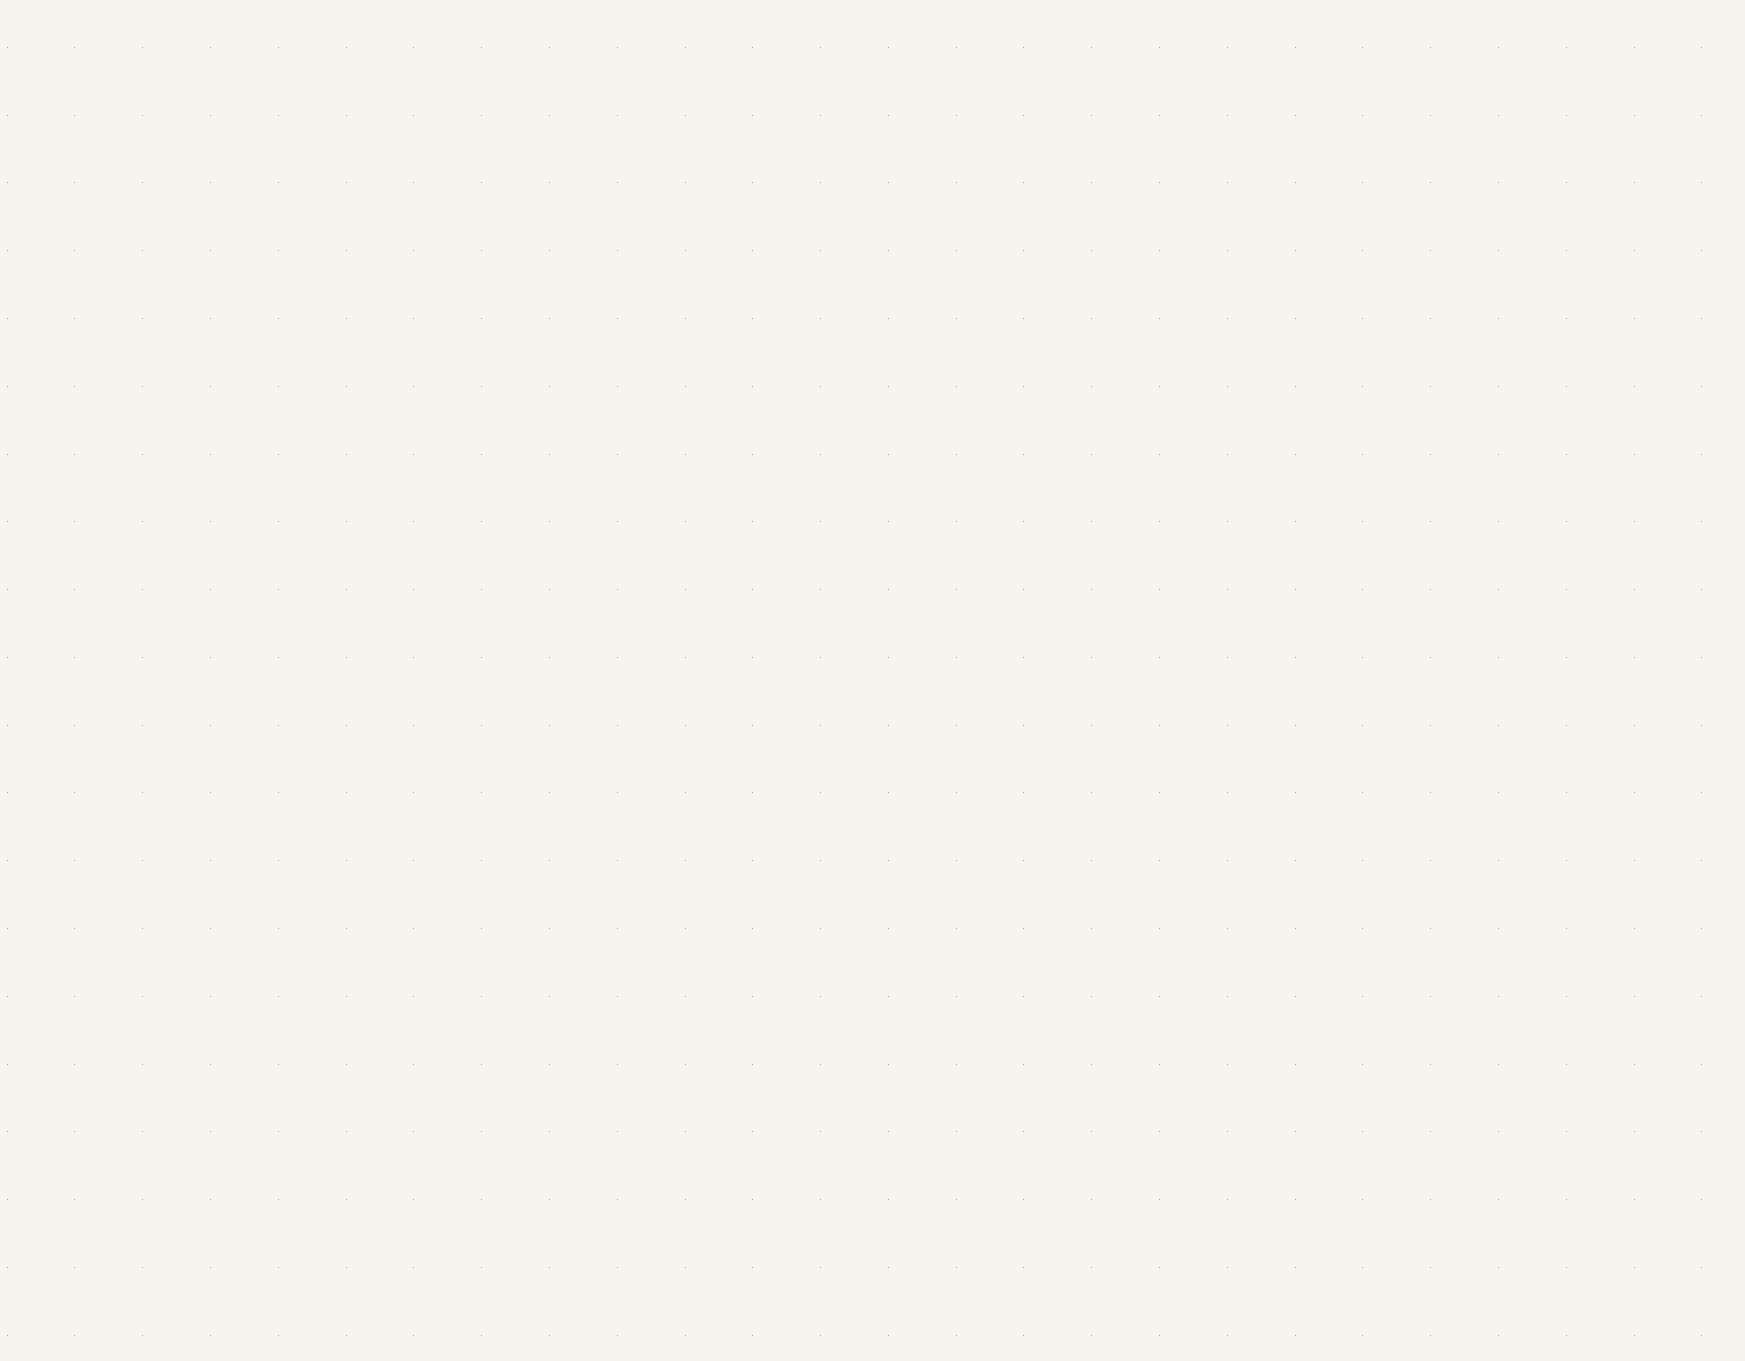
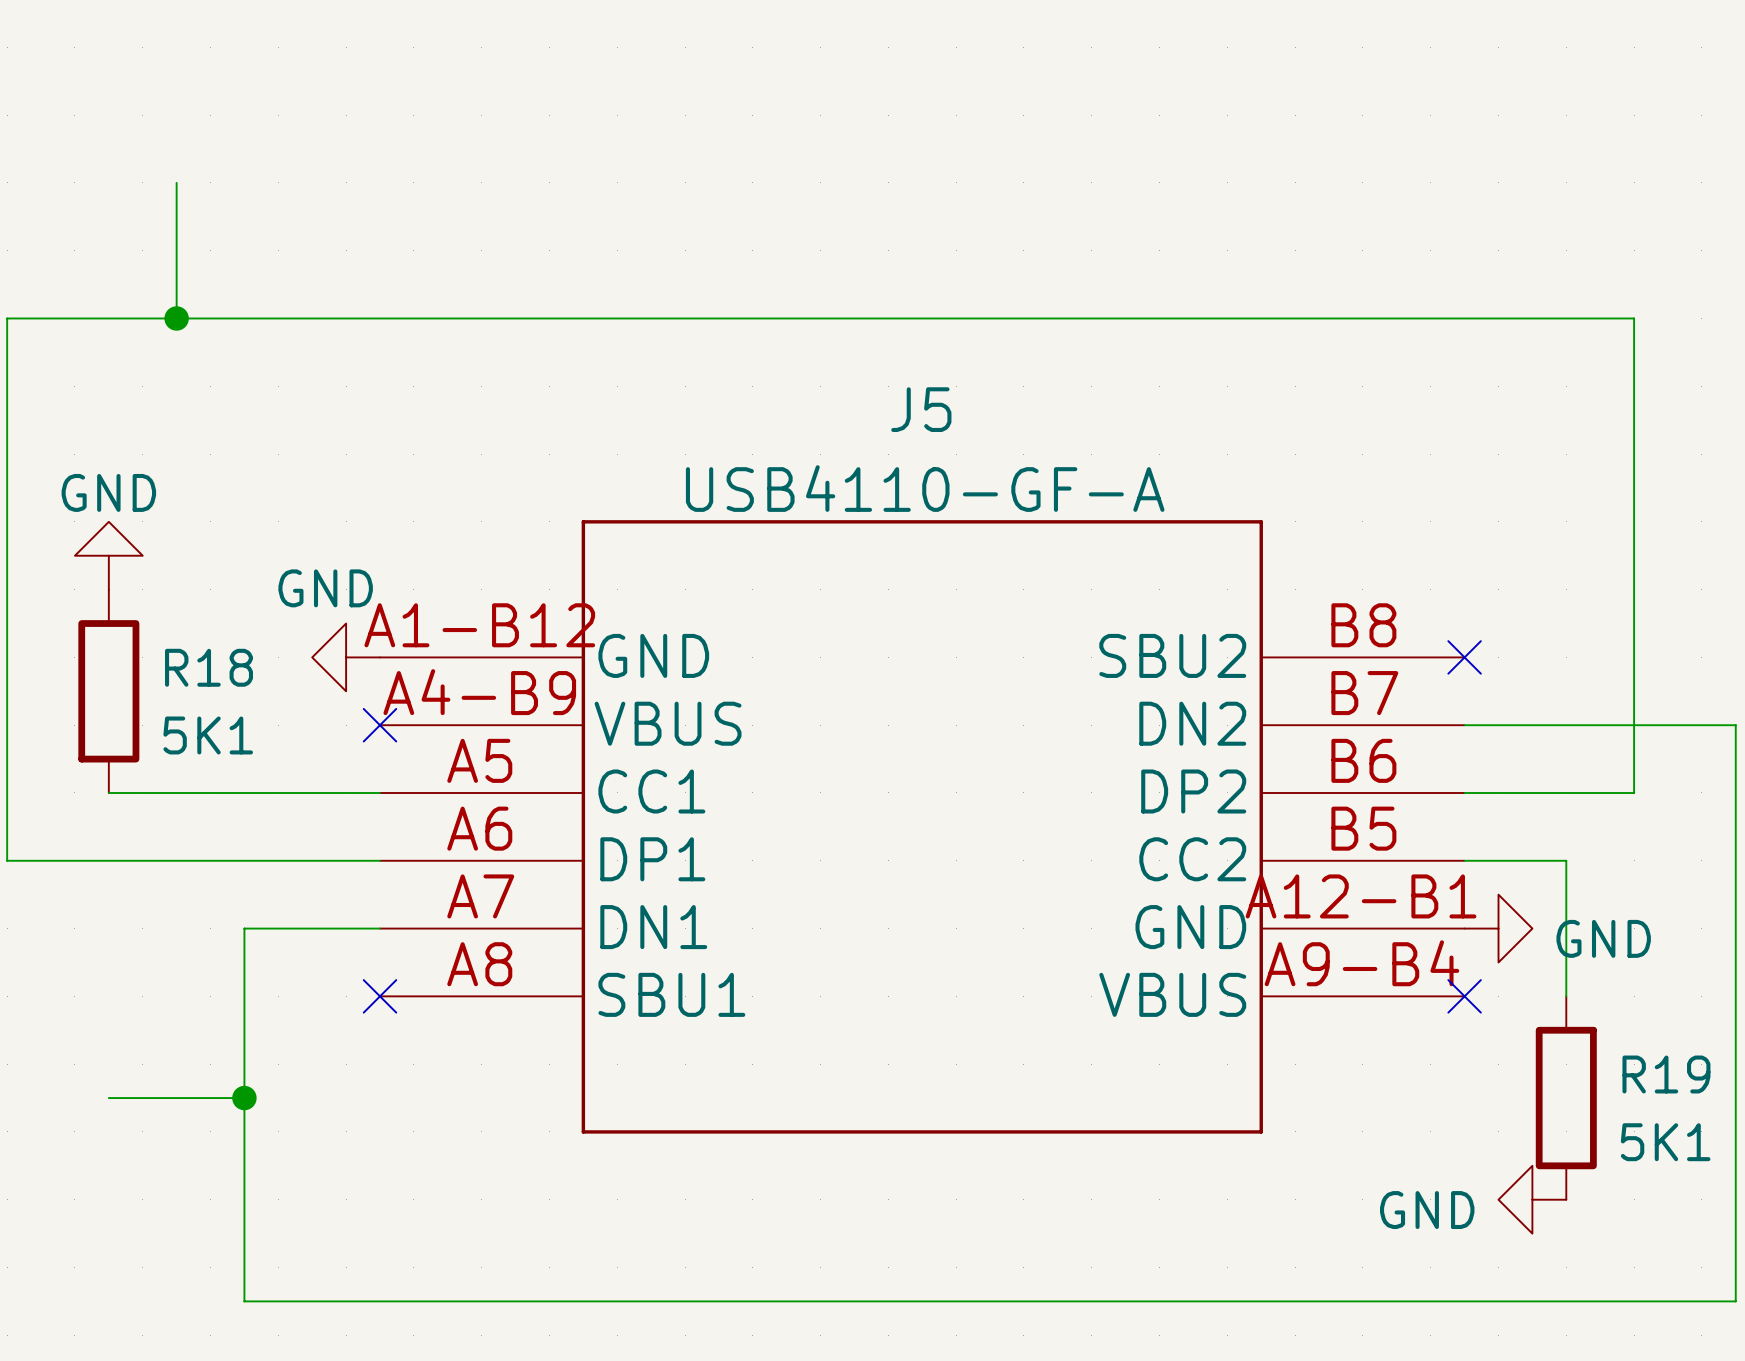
wire: none -> (176, 182) (176, 318)
junction: none -> (176, 318)
power symbol: none -> GND (108, 555)
power symbol: none -> GND (346, 657)
no-connect mark: none -> (1464, 657)
R18: none -> 5K1 (108, 691)
no-connect mark: none -> (380, 725)
wire: none -> (1464, 725) (1735, 725) (1735, 1301) (244, 1301) (244, 928) (380, 928)
wire: none -> (108, 792) (380, 792)
wire: none -> (1464, 792) (1634, 792) (1634, 318) (7, 318) (7, 860) (380, 860)
J5: none -> USB4110-GF-A (922, 826)
wire: none -> (1464, 860) (1566, 860) (1566, 996)
power symbol: none -> GND (1498, 928)
no-connect mark: none -> (380, 996)
no-connect mark: none -> (1464, 996)
wire: none -> (108, 1098) (244, 1098)
junction: none -> (244, 1098)
R19: none -> 5K1 (1566, 1098)
power symbol: none -> GND (1532, 1199)

